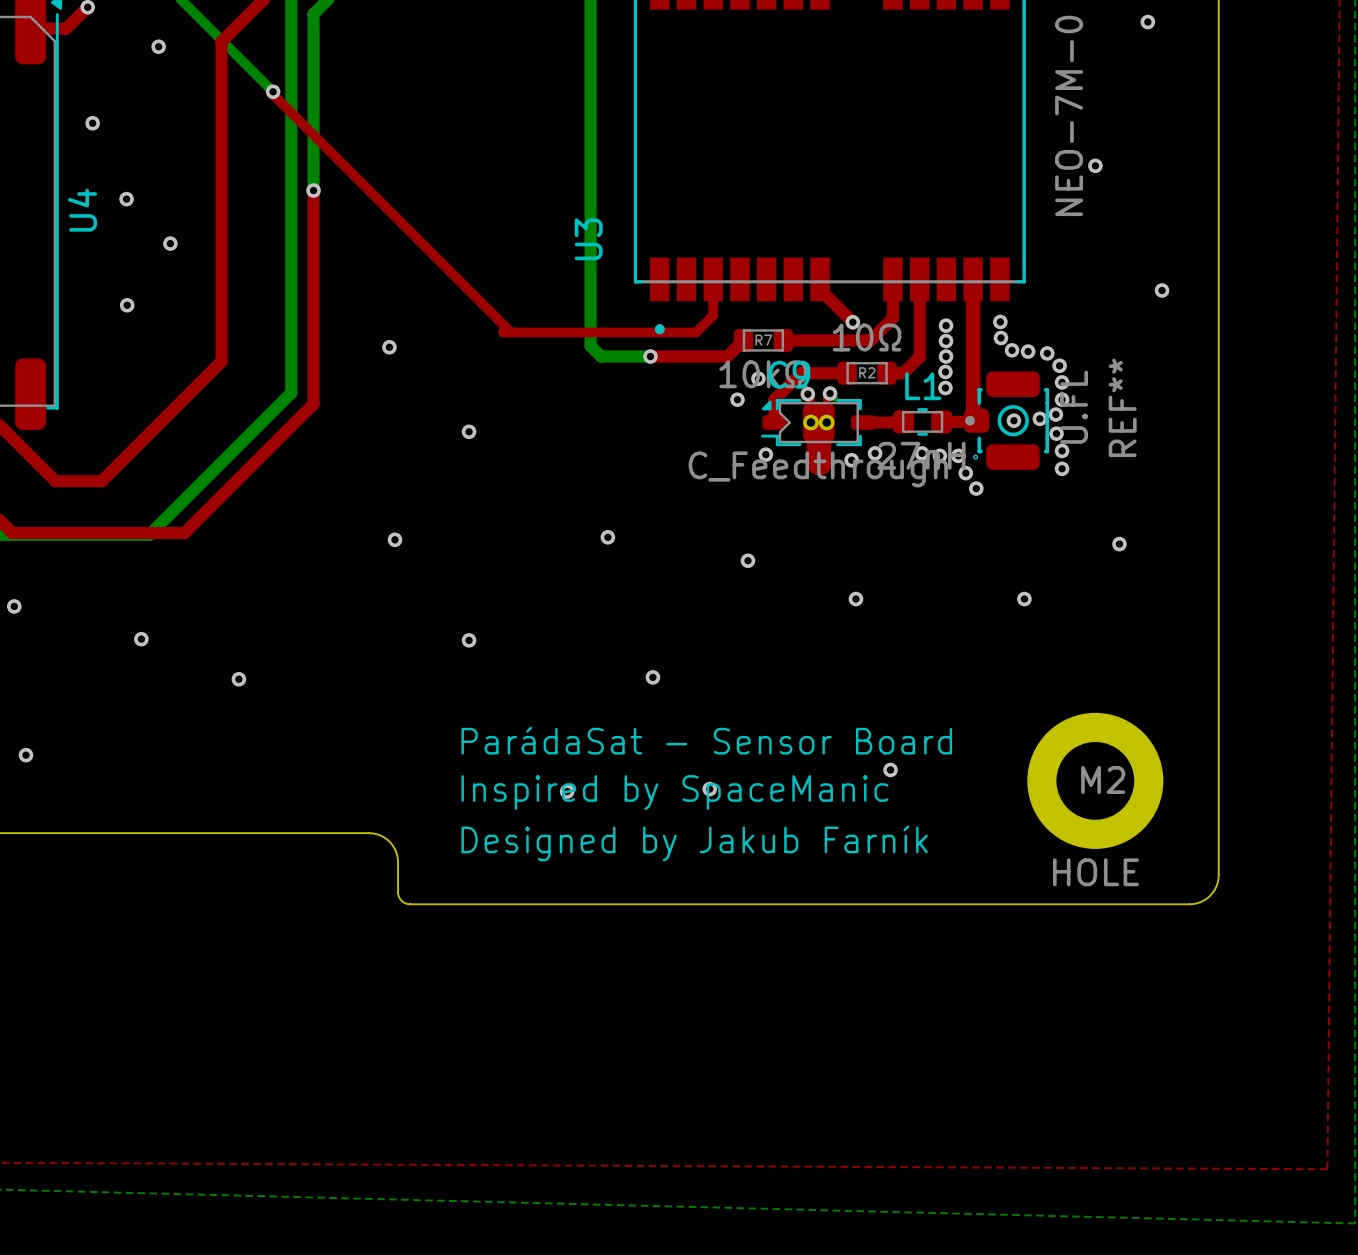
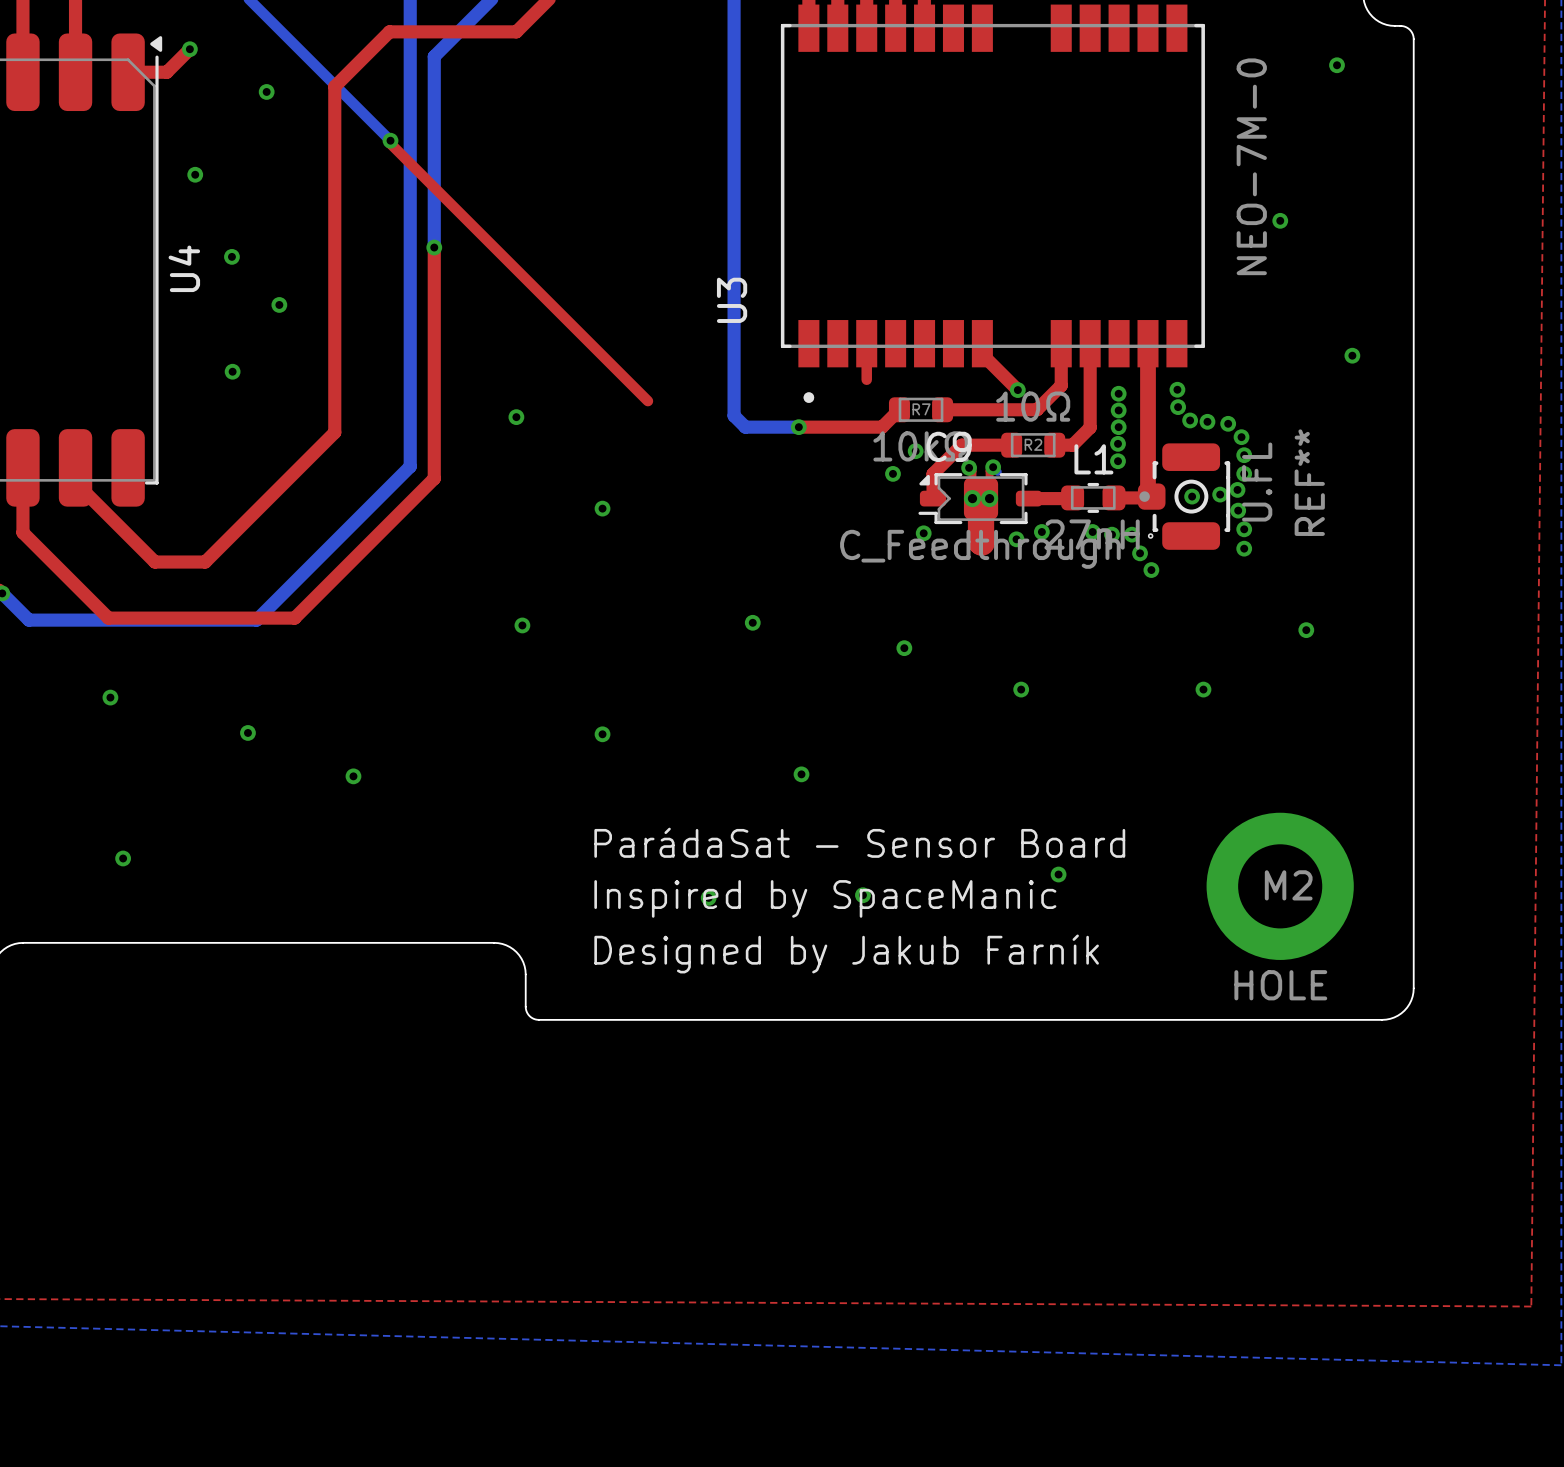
top track: (713, 312) (713, 315) (696, 332) (502, 332) -> none

